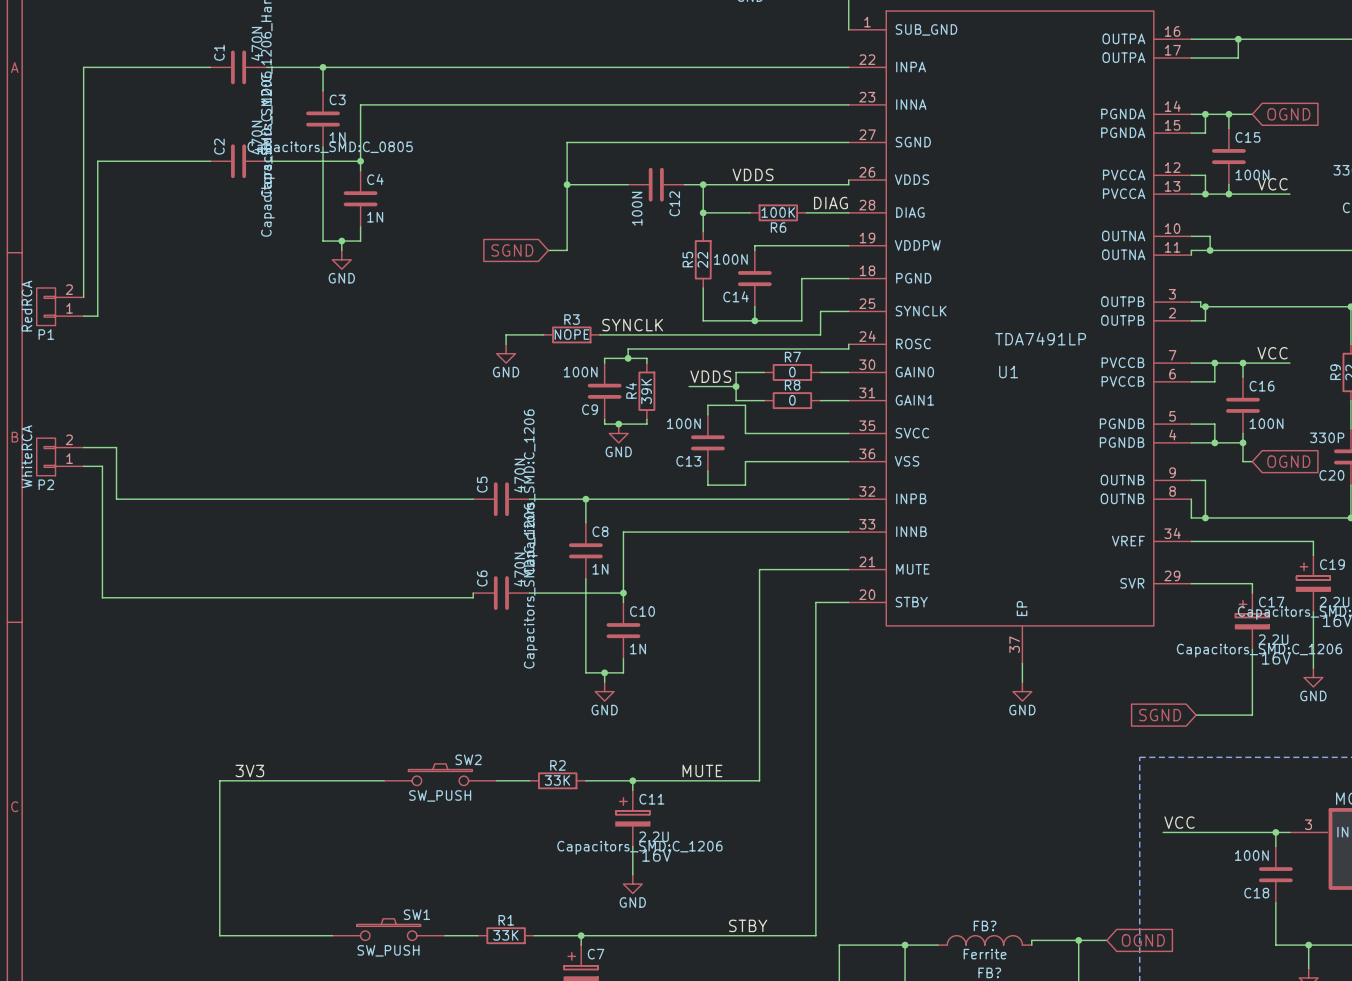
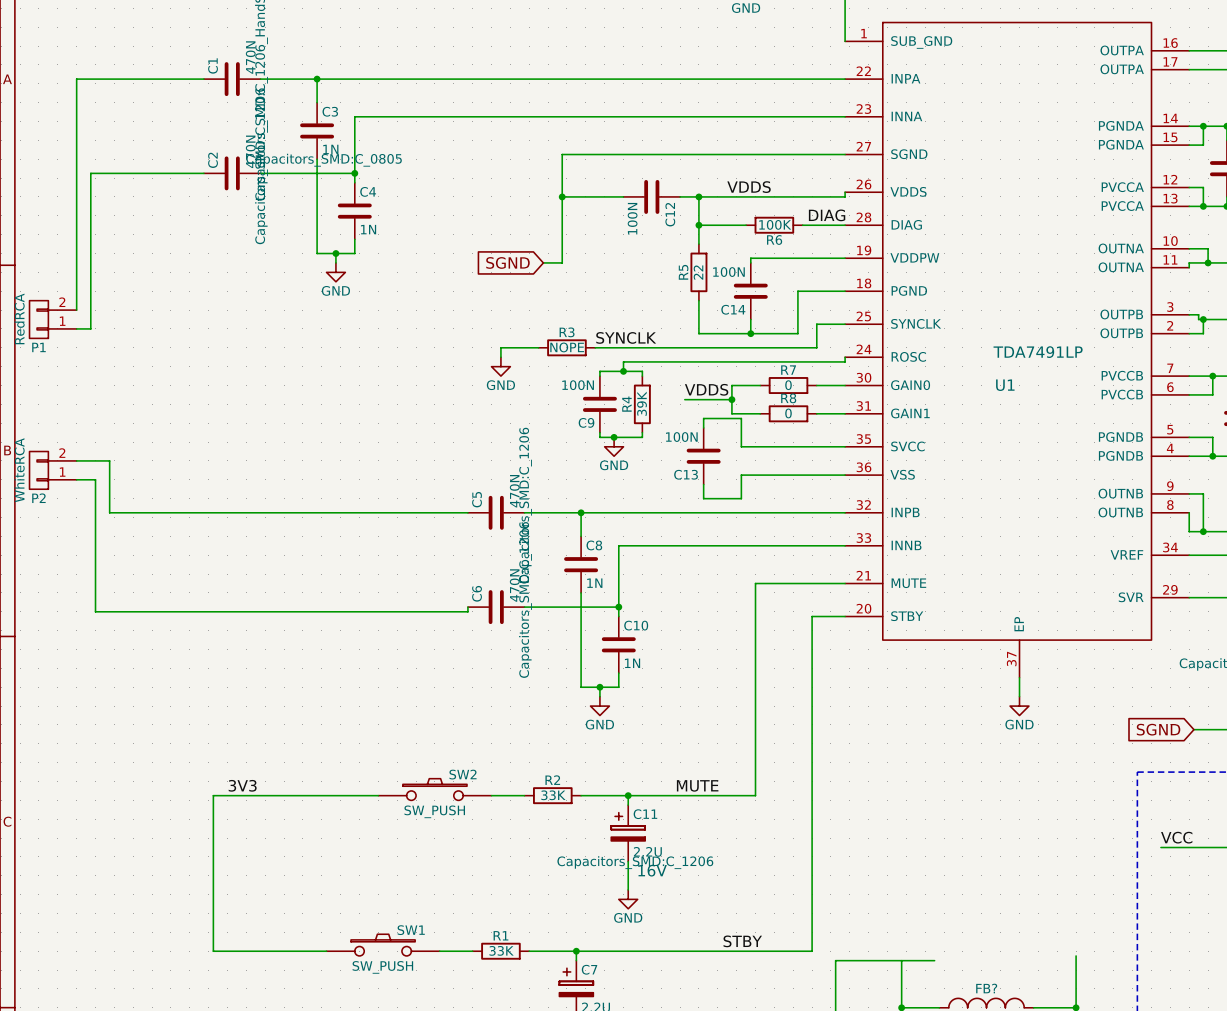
FB?: Ferrite (984, 940) -> none
junction: (1078, 940) -> none
wire: (1106, 940) (1031, 940) (1031, 945) -> none
global label: OGND (1143, 940) -> none
junction: (905, 945) -> none

